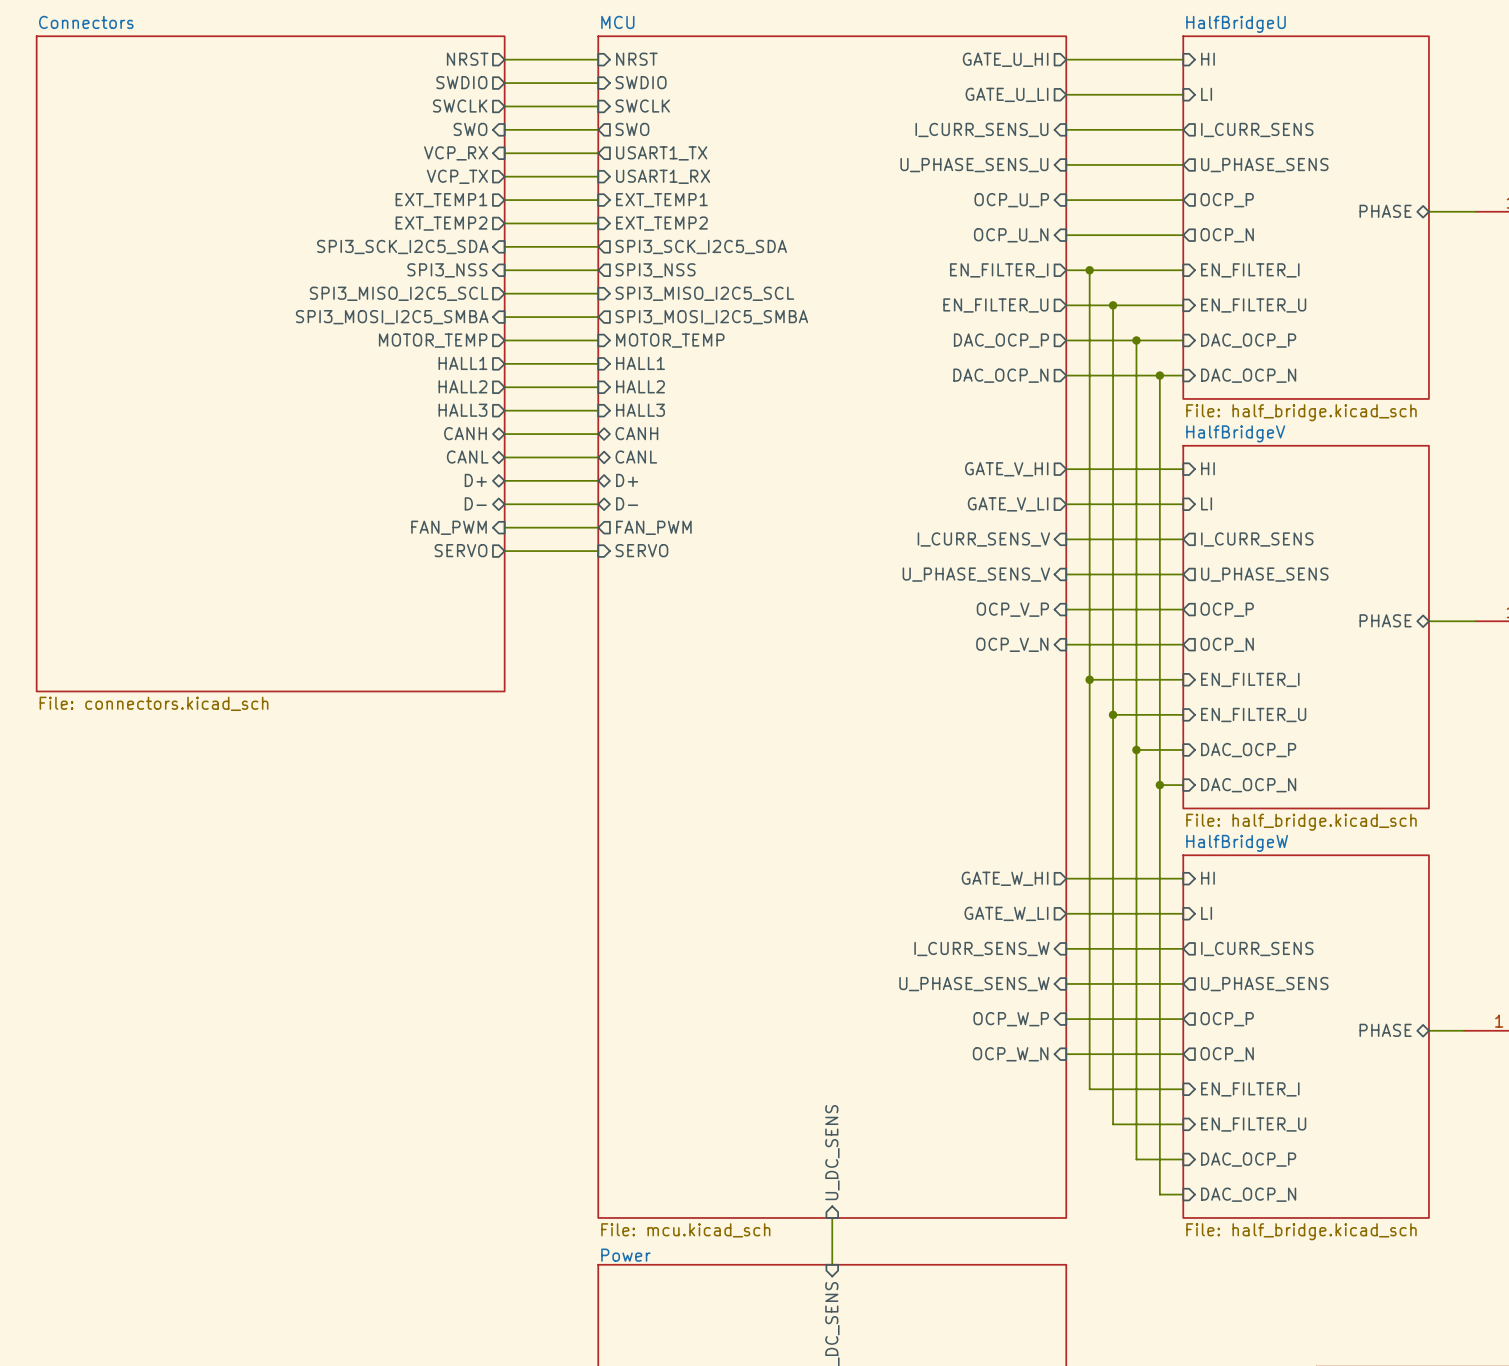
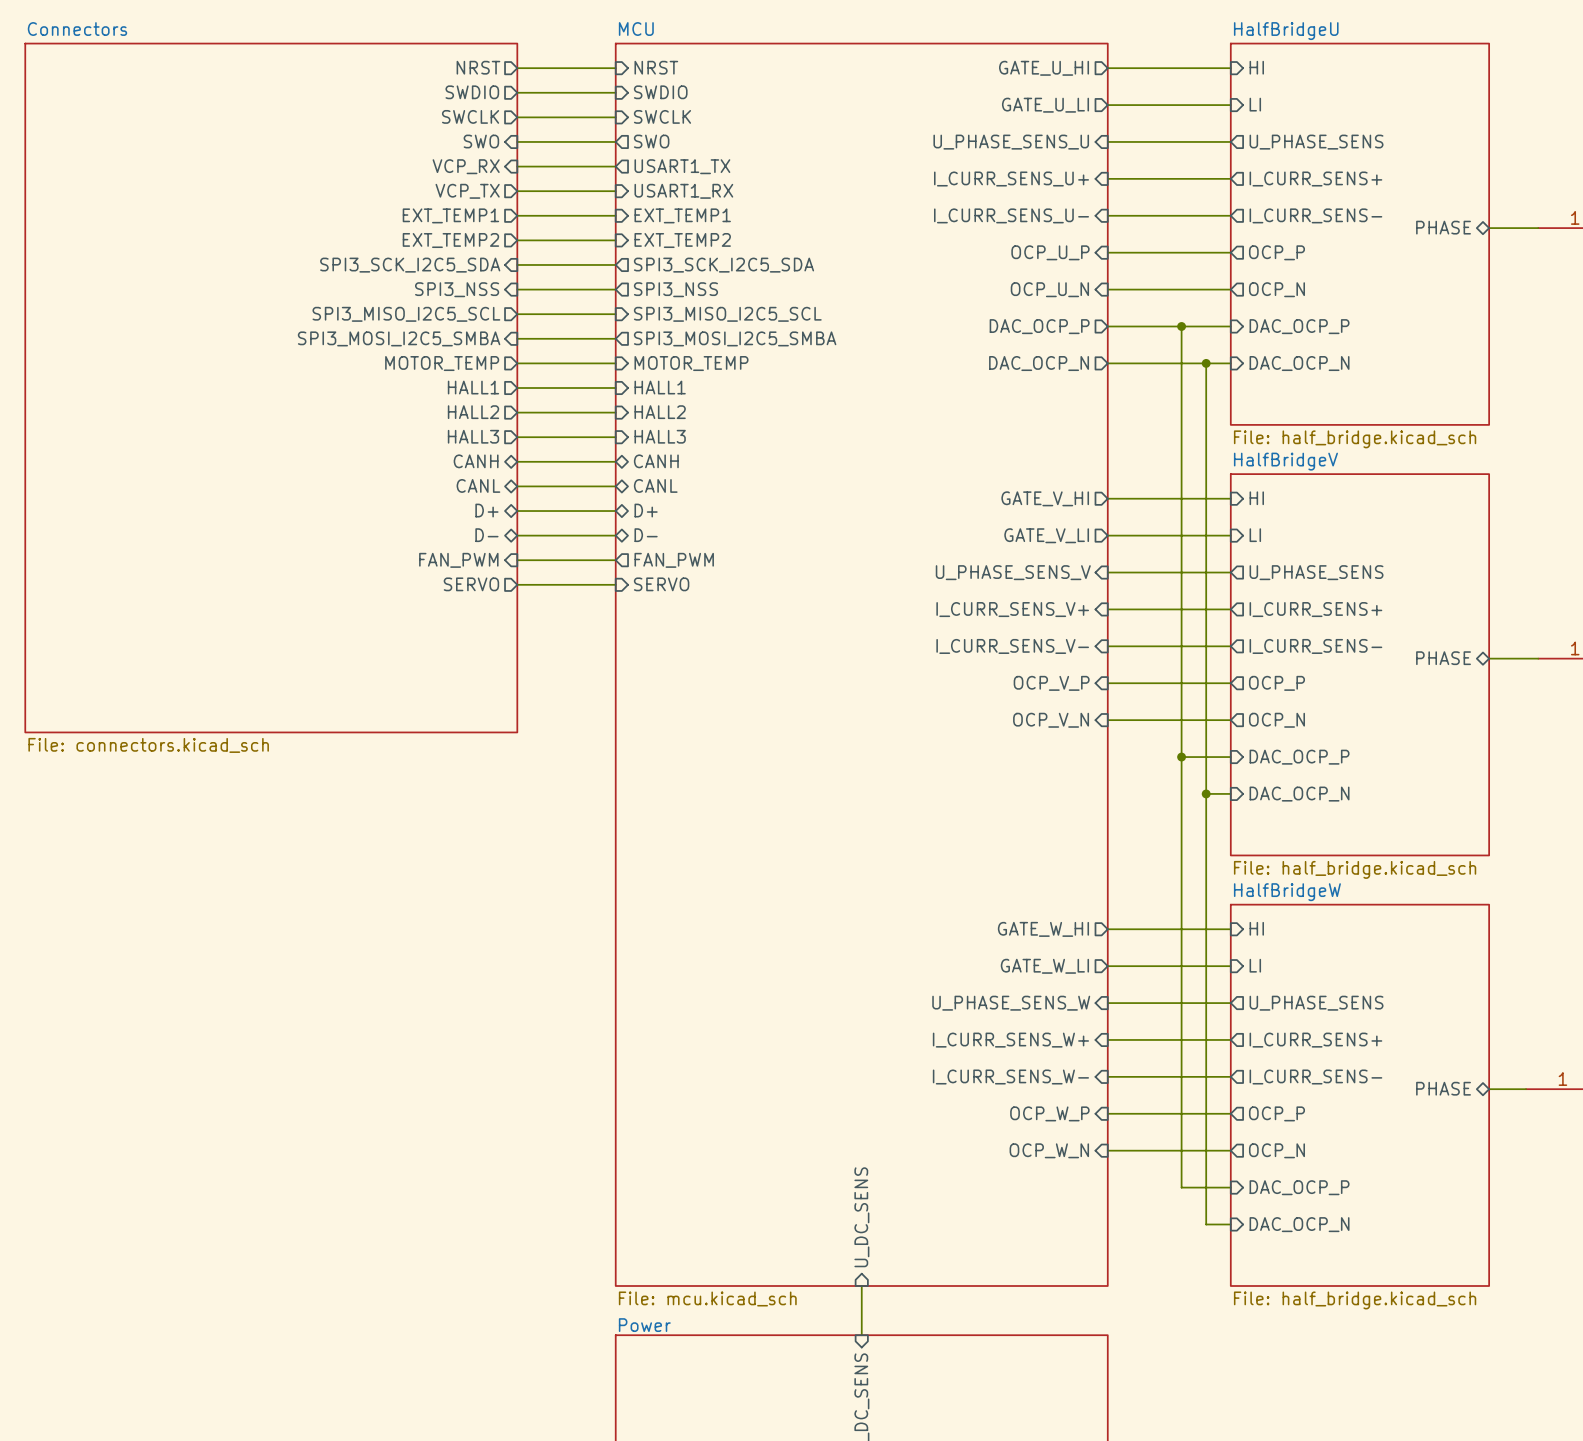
sheet pin: I_CURR_SENS_U (981, 129) -> U_PHASE_SENS_U (1011, 142)
sheet pin: I_CURR_SENS (1257, 129) -> U_PHASE_SENS (1316, 142)
sheet pin: U_PHASE_SENS_U (974, 165) -> I_CURR_SENS_U+ (1011, 179)
sheet pin: U_PHASE_SENS (1264, 165) -> I_CURR_SENS+ (1315, 179)
sheet pin: OCP_U_P (1011, 200) -> I_CURR_SENS_U- (1011, 215)
sheet pin: OCP_P (1227, 200) -> I_CURR_SENS- (1315, 215)
sheet pin: OCP_U_N (1011, 235) -> OCP_U_P (1050, 252)
sheet pin: OCP_N (1227, 235) -> OCP_P (1276, 252)
sheet pin shape: output (999, 270) -> input (1049, 289)
sheet pin: EN_FILTER_I (999, 270) -> OCP_U_N (1049, 289)
wire: (1089, 270) (1089, 1089) -> (1107, 1150) (1132, 1150)
junction: (1089, 270) -> none
sheet pin shape: input (1250, 270) -> output (1276, 289)
sheet pin: EN_FILTER_I (1250, 270) -> OCP_N (1276, 289)
sheet pin: EN_FILTER_U (995, 305) -> DAC_OCP_P (1039, 326)
wire: (1113, 305) (1113, 1124) (1136, 1124) (1136, 1159) (1159, 1159) (1159, 1194) (1183, 1194) -> none
junction: (1113, 305) -> none
wire: none -> (1181, 326) (1181, 363)
junction: none -> (1181, 326)
sheet pin: EN_FILTER_U (1253, 305) -> DAC_OCP_P (1299, 326)
sheet pin: DAC_OCP_P (1001, 340) -> DAC_OCP_N (1039, 363)
junction: (1136, 340) -> none
wire: none -> (1206, 363) (1206, 400)
junction: none -> (1206, 363)
sheet pin: DAC_OCP_P (1248, 340) -> DAC_OCP_N (1299, 363)
sheet pin: DAC_OCP_N (1000, 375) -> none
wire: (1066, 375) (1183, 375) -> none
junction: (1159, 375) -> none
sheet pin: DAC_OCP_N (1248, 375) -> none
sheet pin: I_CURR_SENS_V (983, 539) -> U_PHASE_SENS_V (1013, 572)
sheet pin: I_CURR_SENS (1257, 539) -> U_PHASE_SENS (1316, 572)
sheet pin: U_PHASE_SENS_V (976, 574) -> I_CURR_SENS_V+ (1012, 609)
sheet pin: U_PHASE_SENS (1264, 574) -> I_CURR_SENS+ (1315, 609)
sheet pin: OCP_V_P (1012, 609) -> I_CURR_SENS_V- (1012, 646)
sheet pin: OCP_P (1227, 609) -> I_CURR_SENS- (1315, 646)
sheet pin: OCP_V_N (1012, 644) -> OCP_V_P (1051, 683)
sheet pin: OCP_N (1227, 644) -> OCP_P (1276, 683)
sheet pin: none -> OCP_V_N (1051, 720)
junction: (1089, 679) -> none
sheet pin shape: input (1250, 679) -> output (1276, 720)
sheet pin: EN_FILTER_I (1250, 679) -> OCP_N (1276, 720)
wire: (1113, 714) (1136, 714) -> (1107, 720) (1132, 720)
junction: (1113, 714) -> none
junction: none -> (1181, 757)
sheet pin: EN_FILTER_U (1253, 714) -> DAC_OCP_P (1299, 757)
wire: (1136, 749) (1159, 749) -> none
junction: (1136, 749) -> none
junction: none -> (1206, 793)
sheet pin: DAC_OCP_P (1248, 750) -> DAC_OCP_N (1299, 794)
wire: (1159, 785) (1183, 785) -> none
junction: (1159, 785) -> none
sheet pin: DAC_OCP_N (1248, 785) -> none
sheet pin: I_CURR_SENS_W (981, 948) -> U_PHASE_SENS_W (1011, 1003)
sheet pin: I_CURR_SENS (1257, 948) -> U_PHASE_SENS (1316, 1003)
sheet pin: U_PHASE_SENS_W (974, 984) -> I_CURR_SENS_W+ (1010, 1040)
sheet pin: U_PHASE_SENS (1264, 984) -> I_CURR_SENS+ (1315, 1040)
sheet pin: OCP_W_P (1011, 1019) -> I_CURR_SENS_W- (1010, 1077)
sheet pin: OCP_P (1227, 1019) -> I_CURR_SENS- (1315, 1077)
sheet pin: OCP_W_N (1010, 1054) -> OCP_W_P (1049, 1113)
sheet pin: OCP_N (1227, 1054) -> OCP_P (1276, 1113)
sheet pin: none -> OCP_W_N (1049, 1150)
sheet pin shape: input (1250, 1089) -> output (1276, 1150)
sheet pin: EN_FILTER_I (1250, 1089) -> OCP_N (1276, 1150)
sheet pin: EN_FILTER_U (1253, 1124) -> DAC_OCP_P (1299, 1187)
sheet pin: DAC_OCP_P (1248, 1159) -> DAC_OCP_N (1299, 1224)
sheet pin: DAC_OCP_N (1248, 1194) -> none

